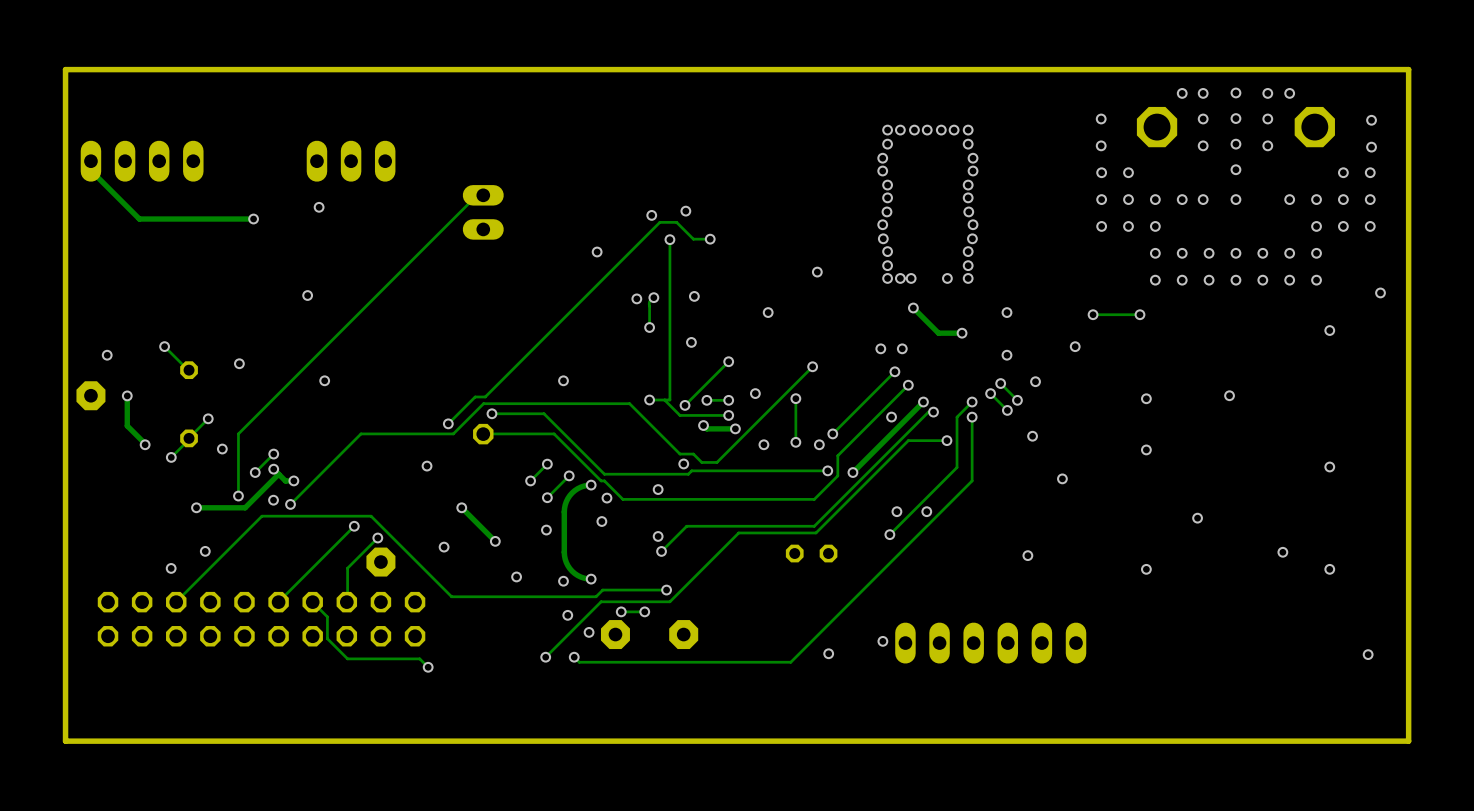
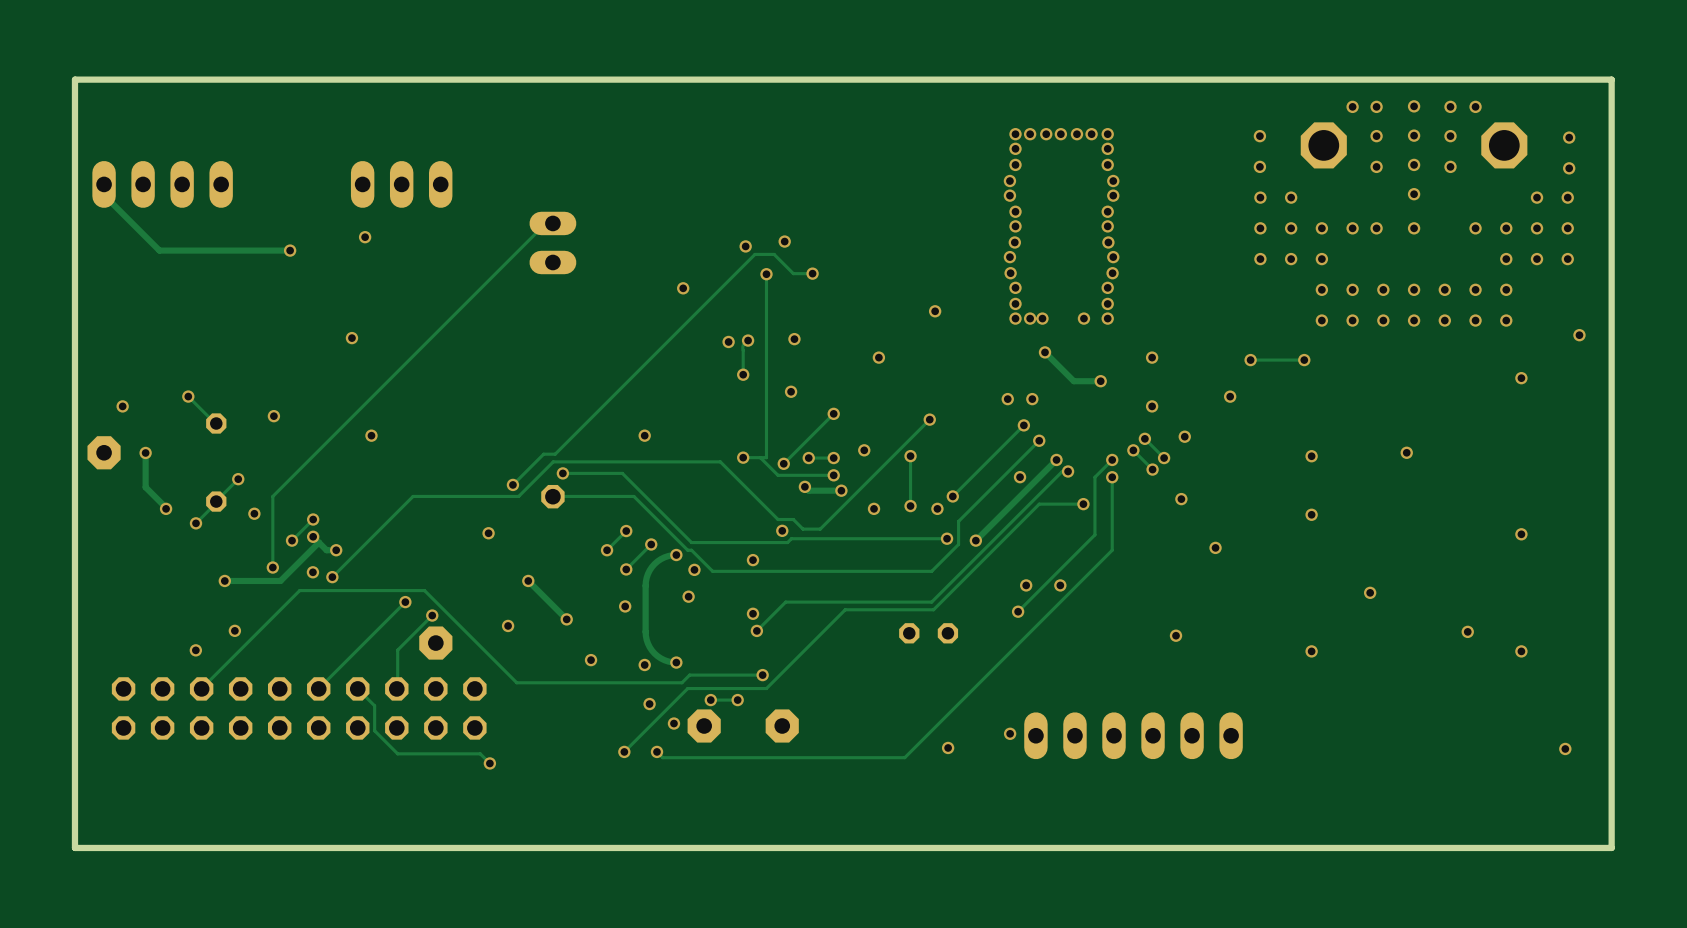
via: none -> (1015, 134)
via: none -> (1030, 134)
via: none -> (1046, 134)
via: none -> (1060, 134)
via: none -> (1076, 134)
via: none -> (1091, 134)
via: none -> (1107, 134)
via: (900, 130) -> none
via: (914, 130) -> none
via: (927, 130) -> none
via: (941, 130) -> none
via: (954, 130) -> none

